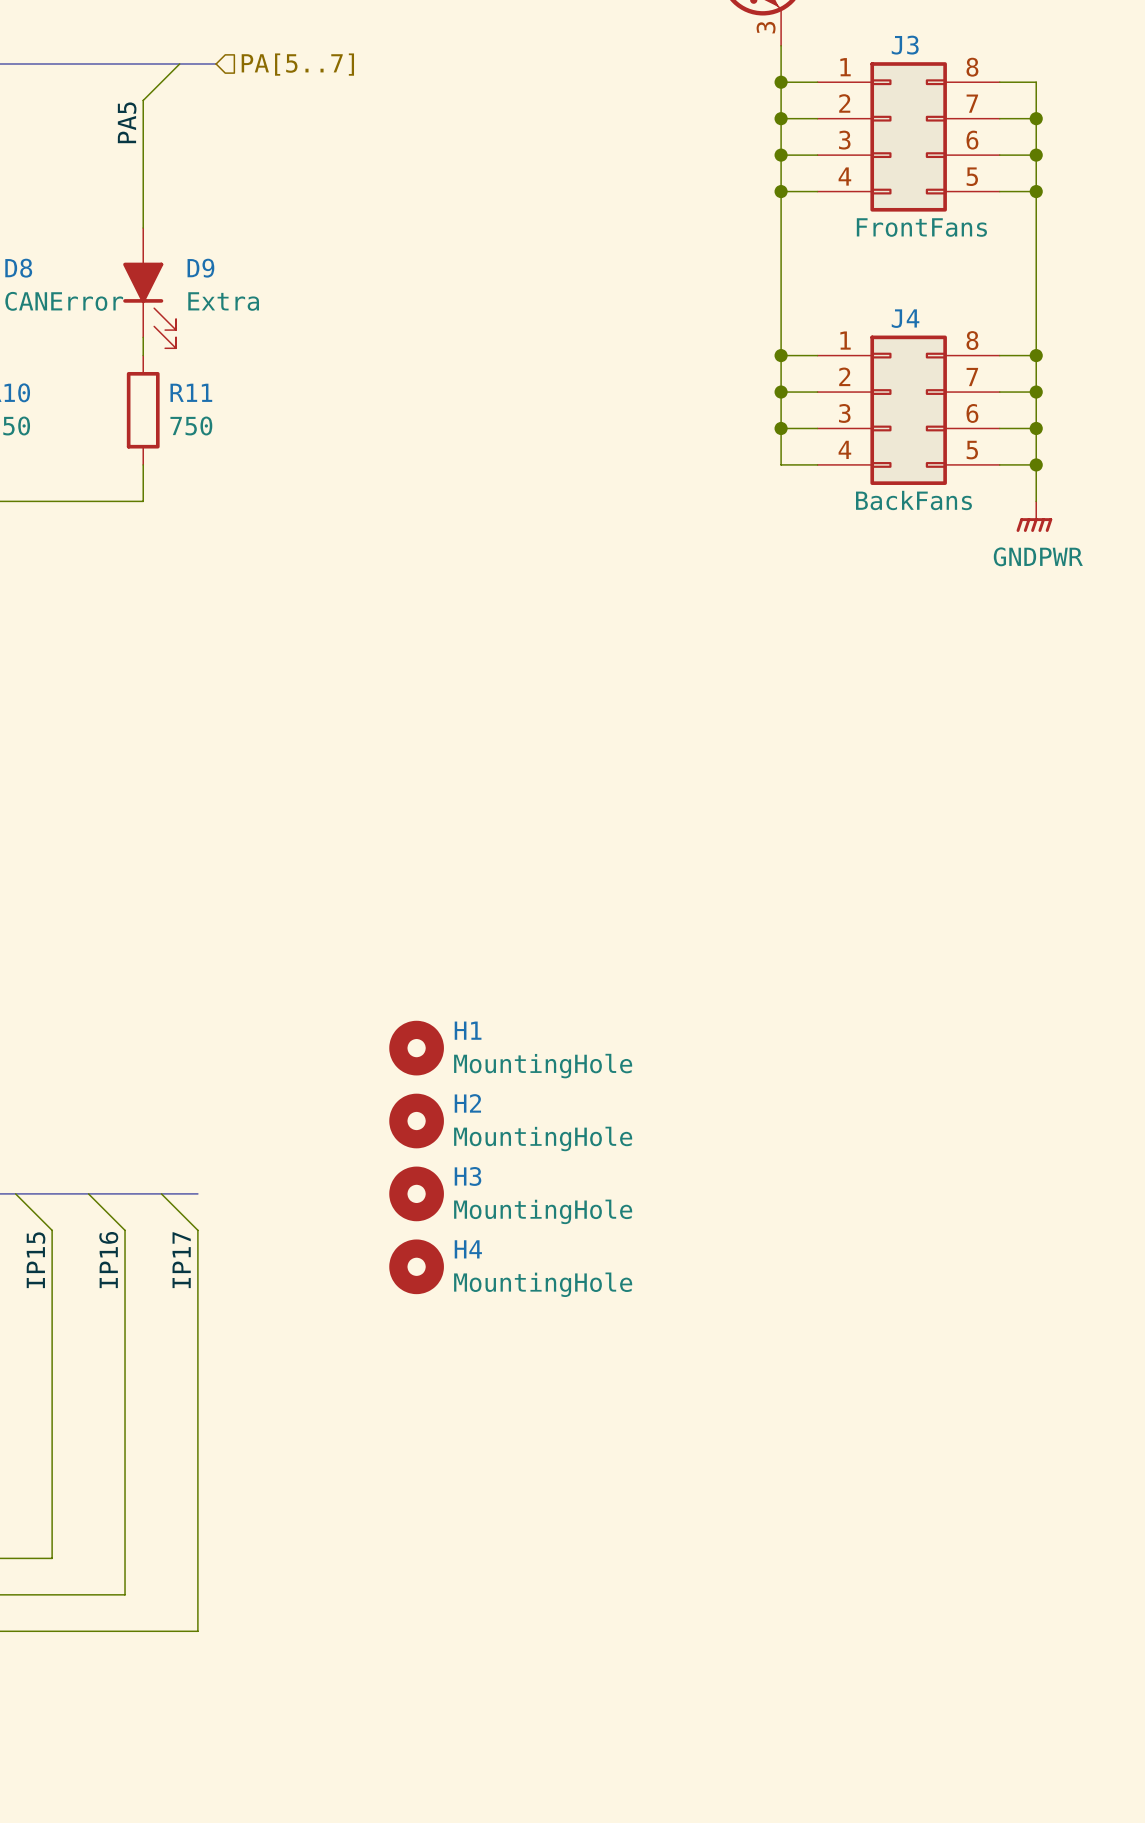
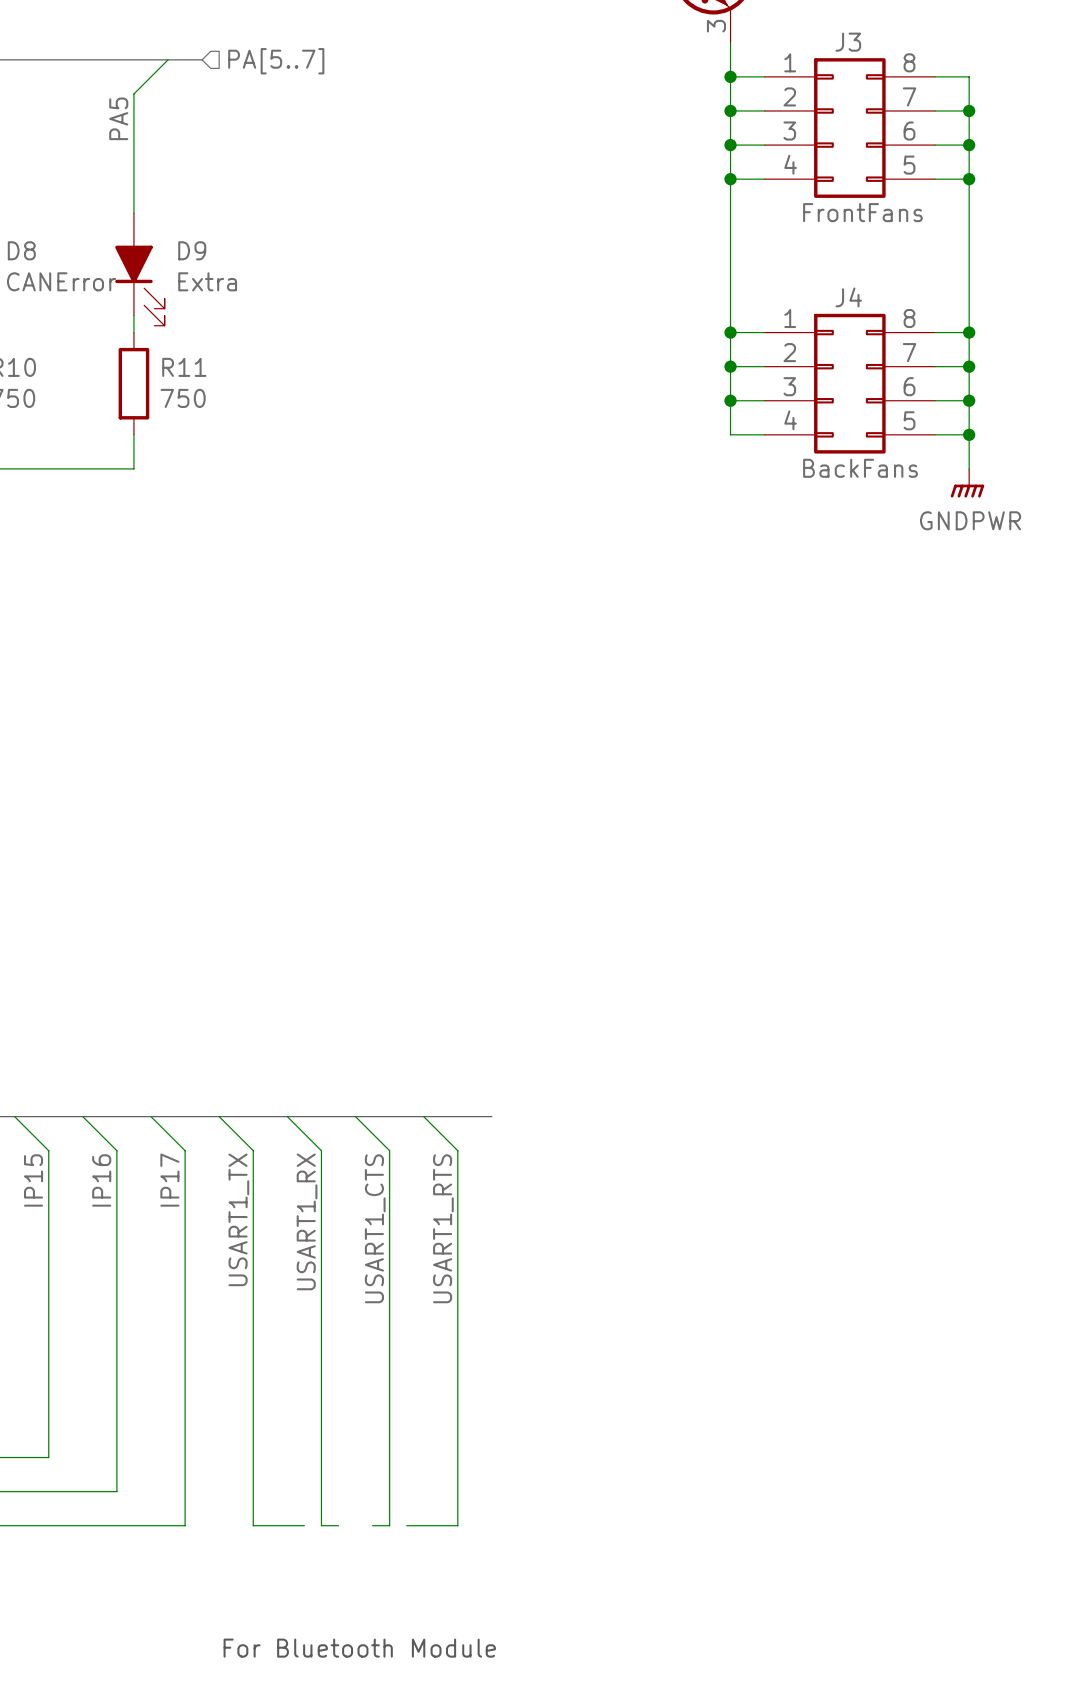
H1: MountingHole (416, 1048) -> none
H2: MountingHole (416, 1121) -> none
bus: none -> (185, 1116) (491, 1116)
wire: none -> (219, 1116) (253, 1150) (253, 1525) (304, 1525)
wire: none -> (287, 1116) (321, 1150) (321, 1525) (338, 1525)
wire: none -> (355, 1116) (389, 1150) (389, 1525) (372, 1525)
H3: MountingHole (416, 1193) -> none
wire: none -> (423, 1116) (457, 1150) (457, 1525) (406, 1525)
H4: MountingHole (416, 1266) -> none
label: none -> USART1_TX (238, 1219)
label: none -> USART1_RX (307, 1221)
label: none -> USART1_CTS (375, 1228)
label: none -> USART1_RTS (443, 1228)
text: none -> For Bluetooth Module (359, 1648)

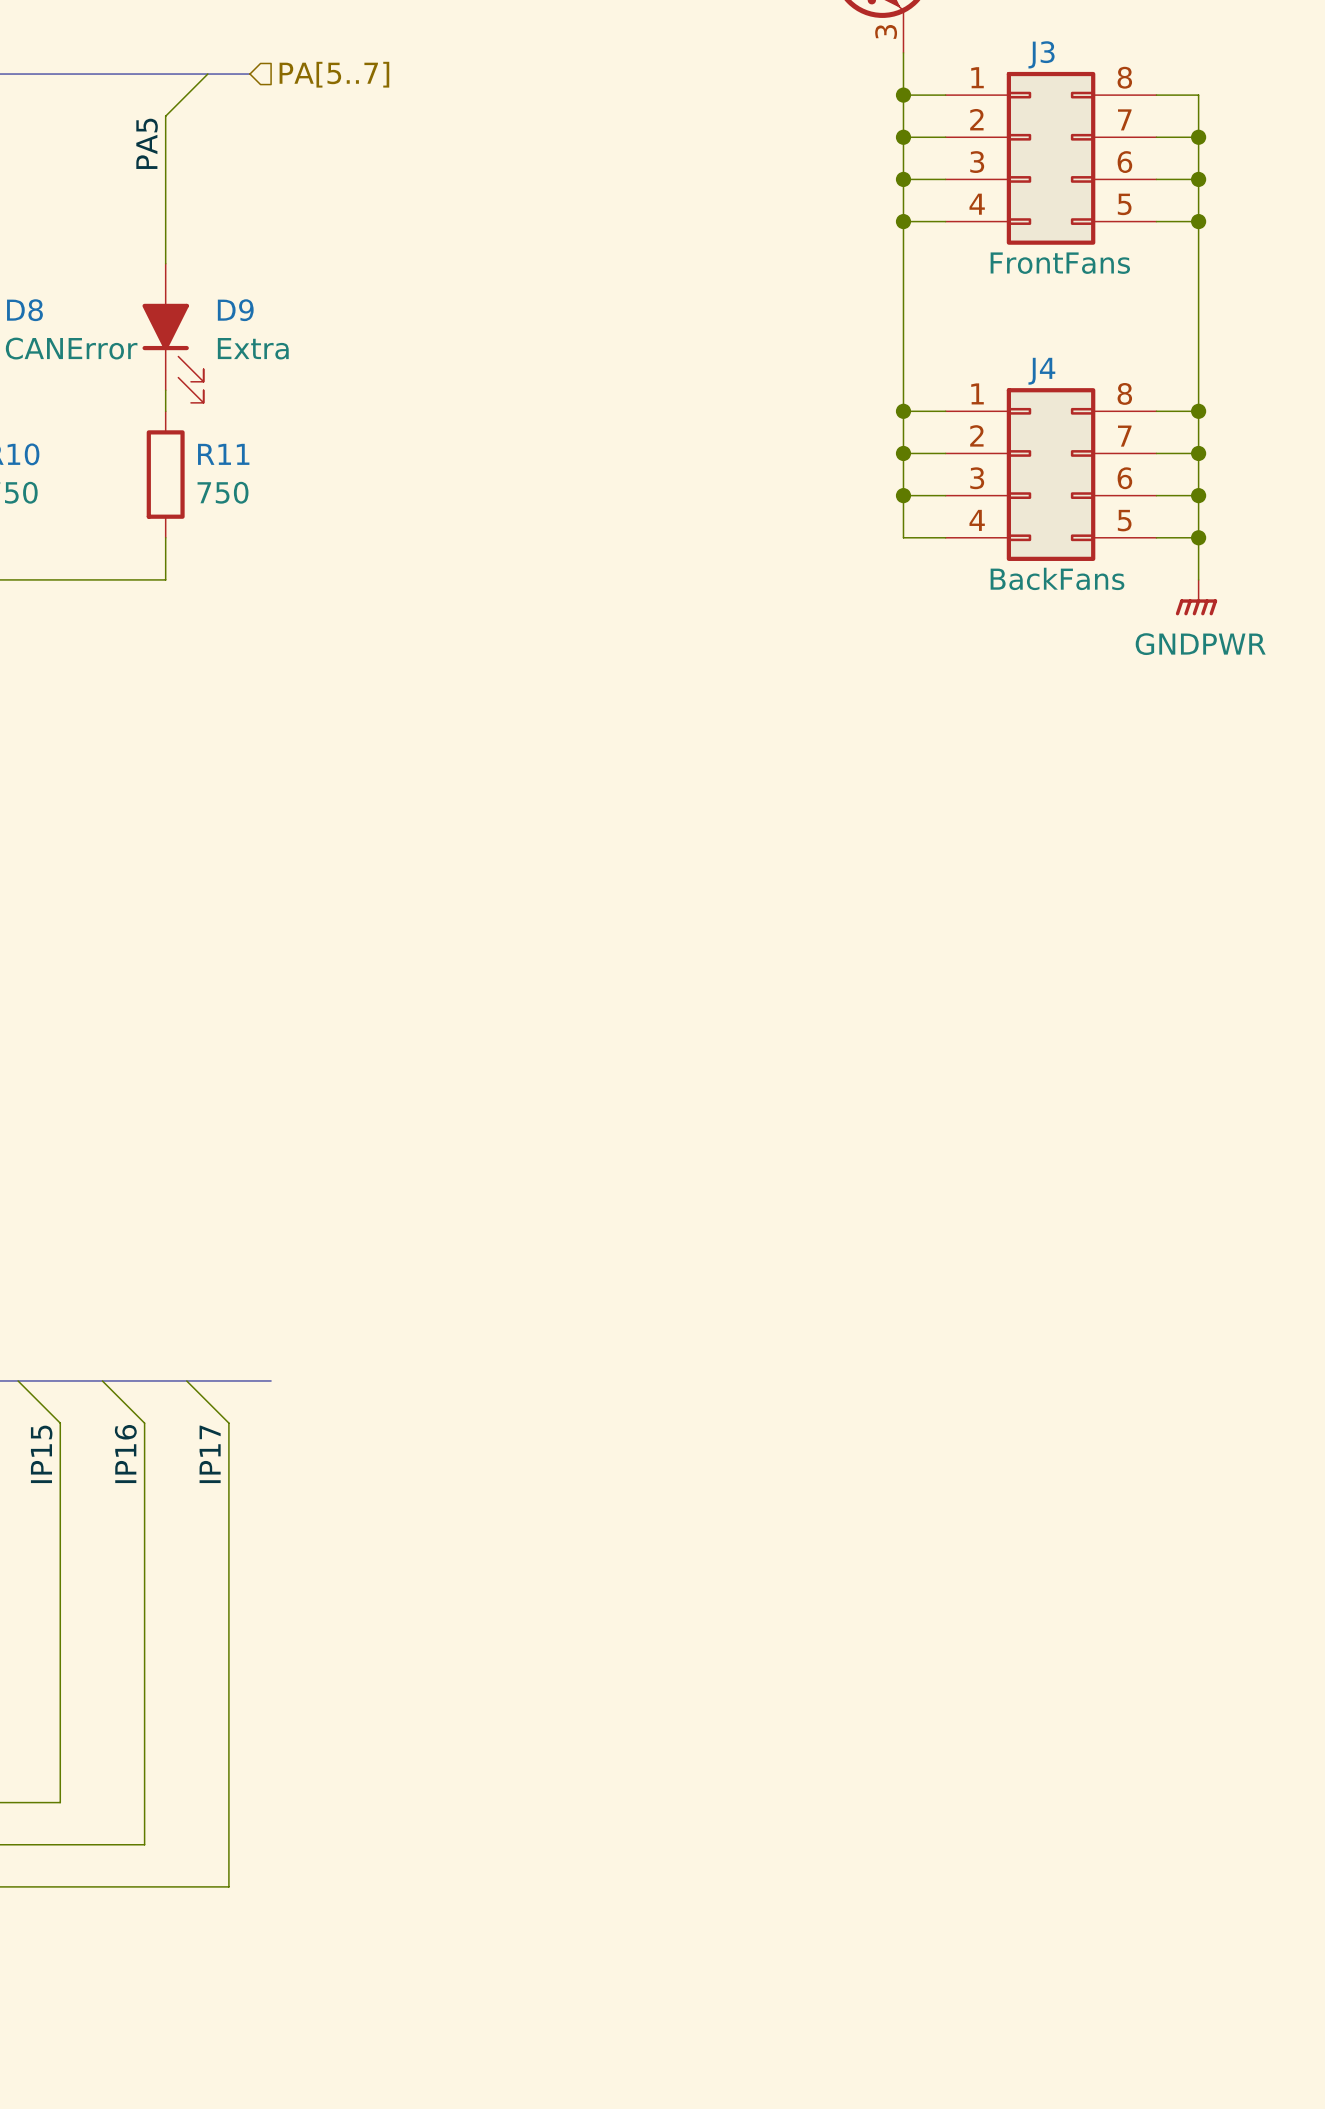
wire: (219, 1116) (253, 1150) (253, 1525) (304, 1525) -> none
bus: (219, 1116) (491, 1116) -> none
wire: (287, 1116) (321, 1150) (321, 1525) (338, 1525) -> none
wire: (355, 1116) (389, 1150) (389, 1525) (372, 1525) -> none
wire: (423, 1116) (457, 1150) (457, 1525) (406, 1525) -> none
label: USART1_TX (238, 1219) -> none
label: USART1_RX (307, 1221) -> none
label: USART1_CTS (375, 1228) -> none
label: USART1_RTS (443, 1228) -> none
text: For Bluetooth Module (359, 1648) -> none

